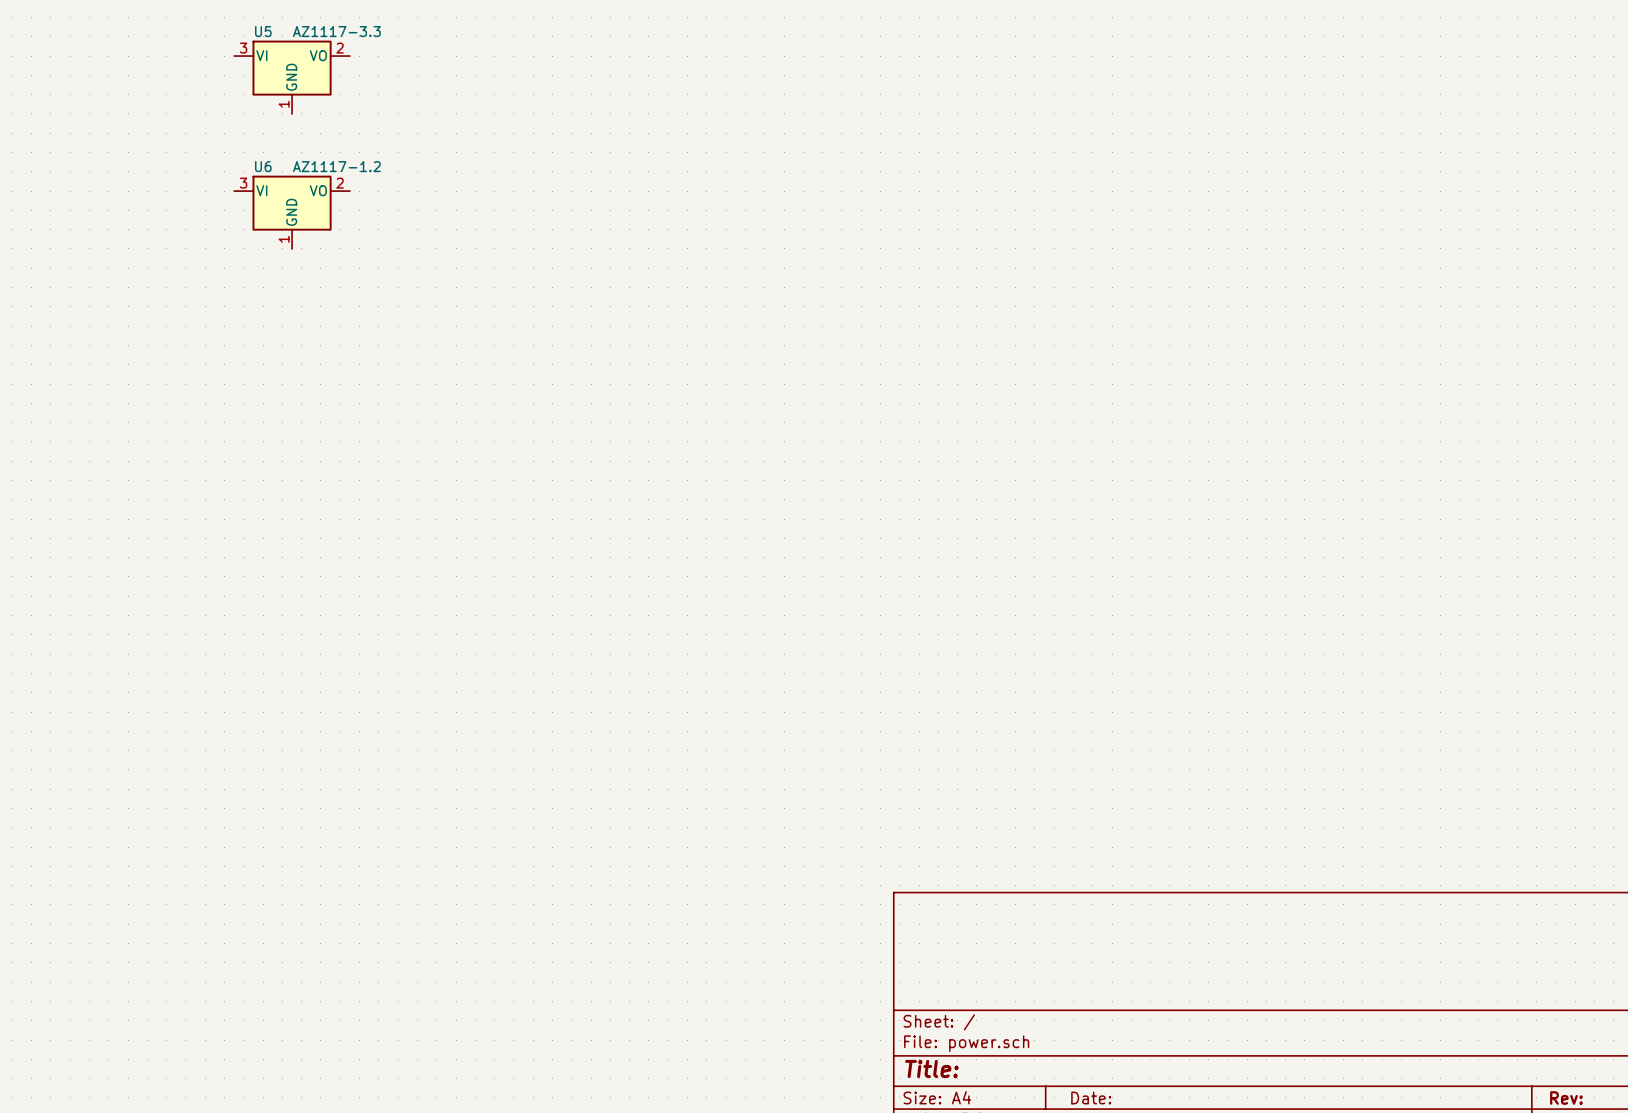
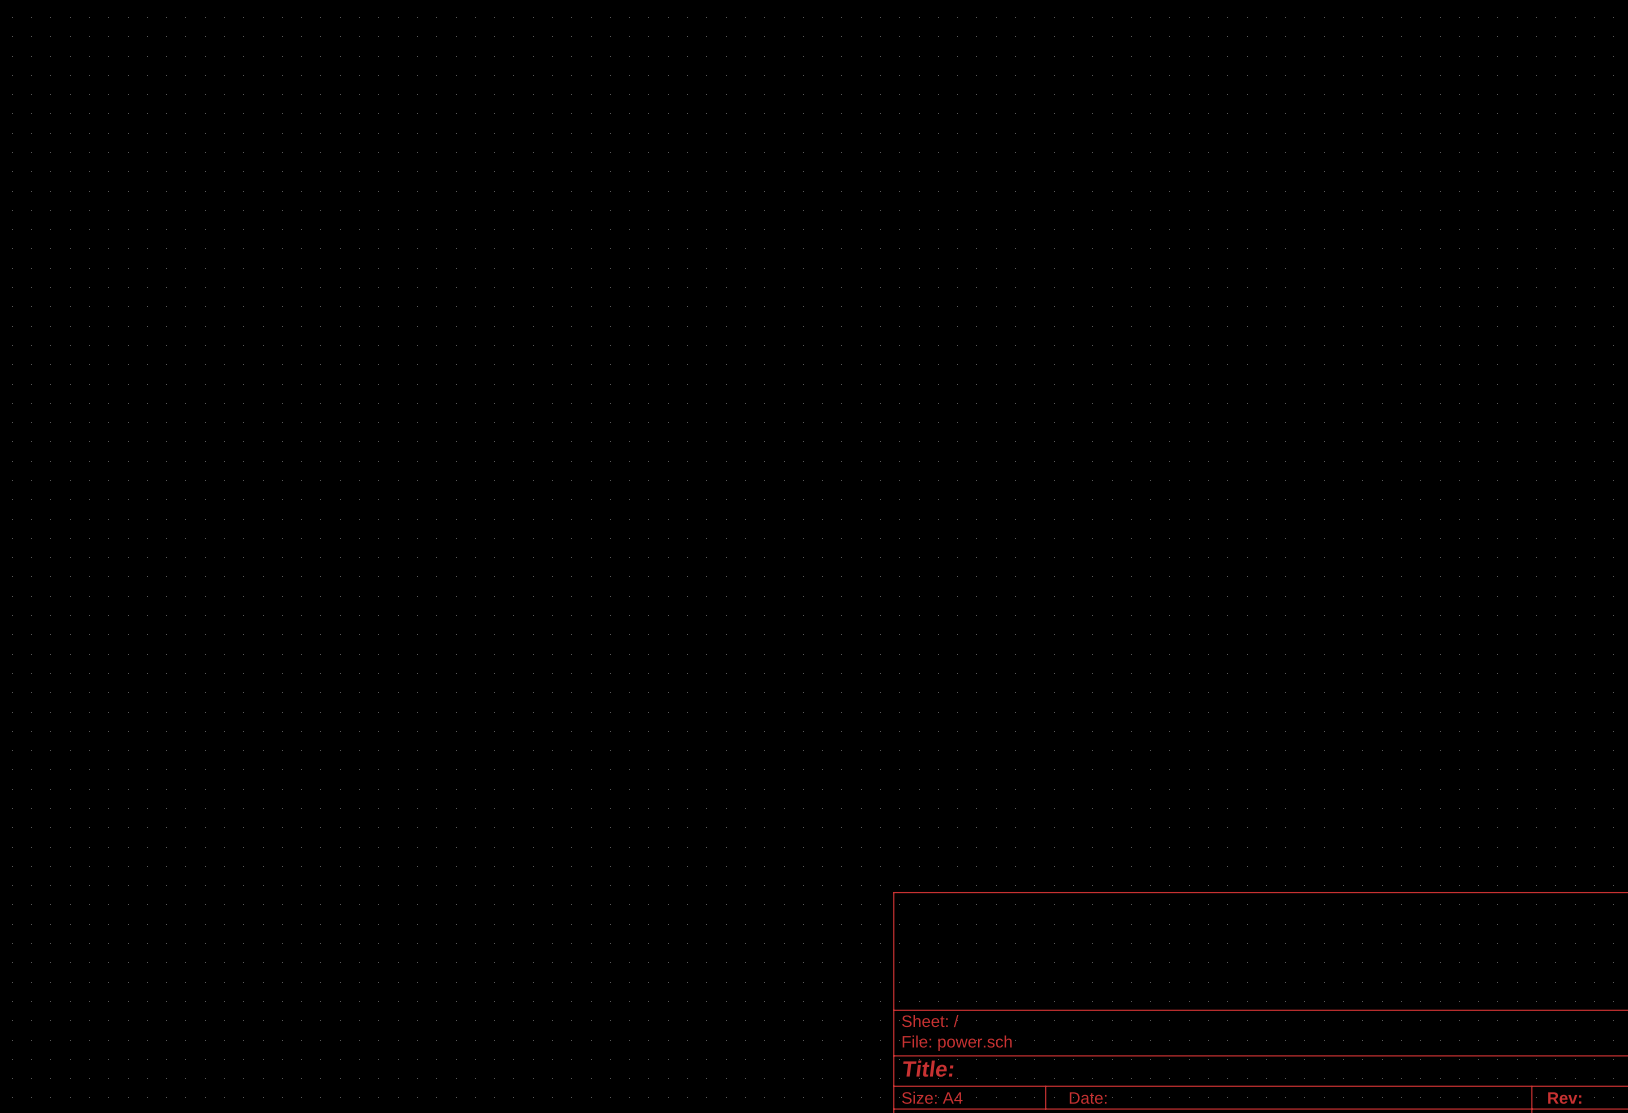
U5: AZ1117-3.3 (292, 77) -> none
U6: AZ1117-1.2 (292, 212) -> none

